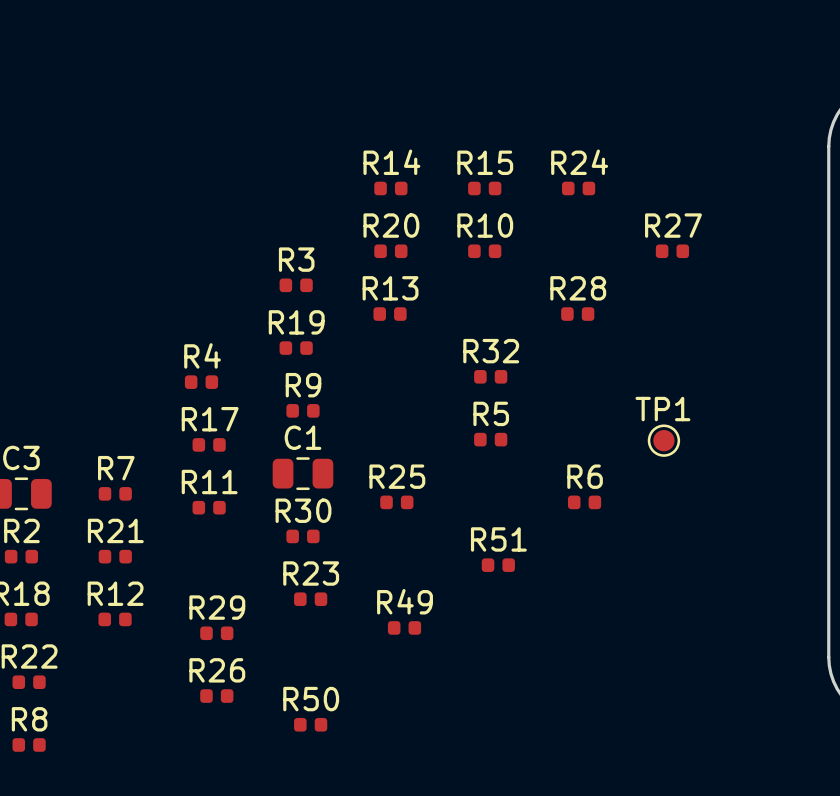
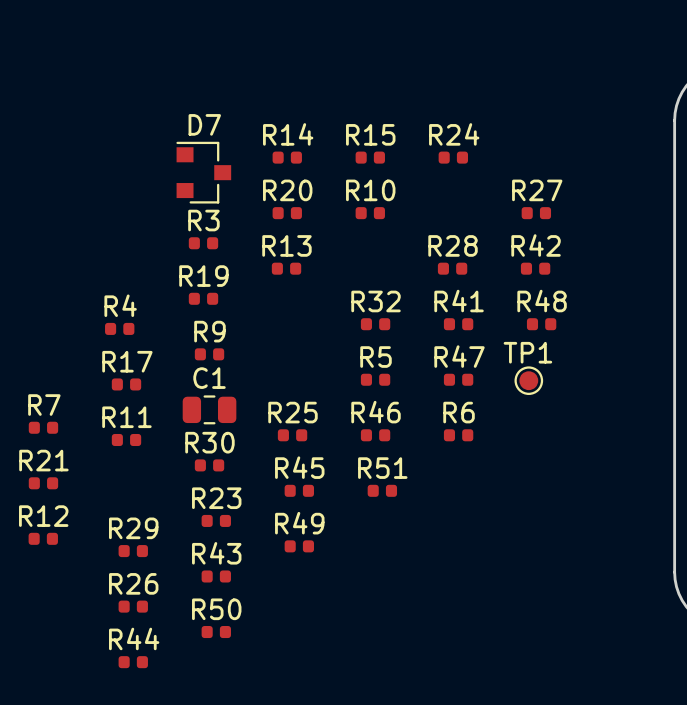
D7: none -> (203, 172)
R42: none -> (535, 268)
R41: none -> (458, 324)
R48: none -> (541, 324)
R47: none -> (458, 379)
R46: none -> (375, 435)
R45: none -> (299, 490)
R43: none -> (216, 576)
R44: none -> (133, 662)

